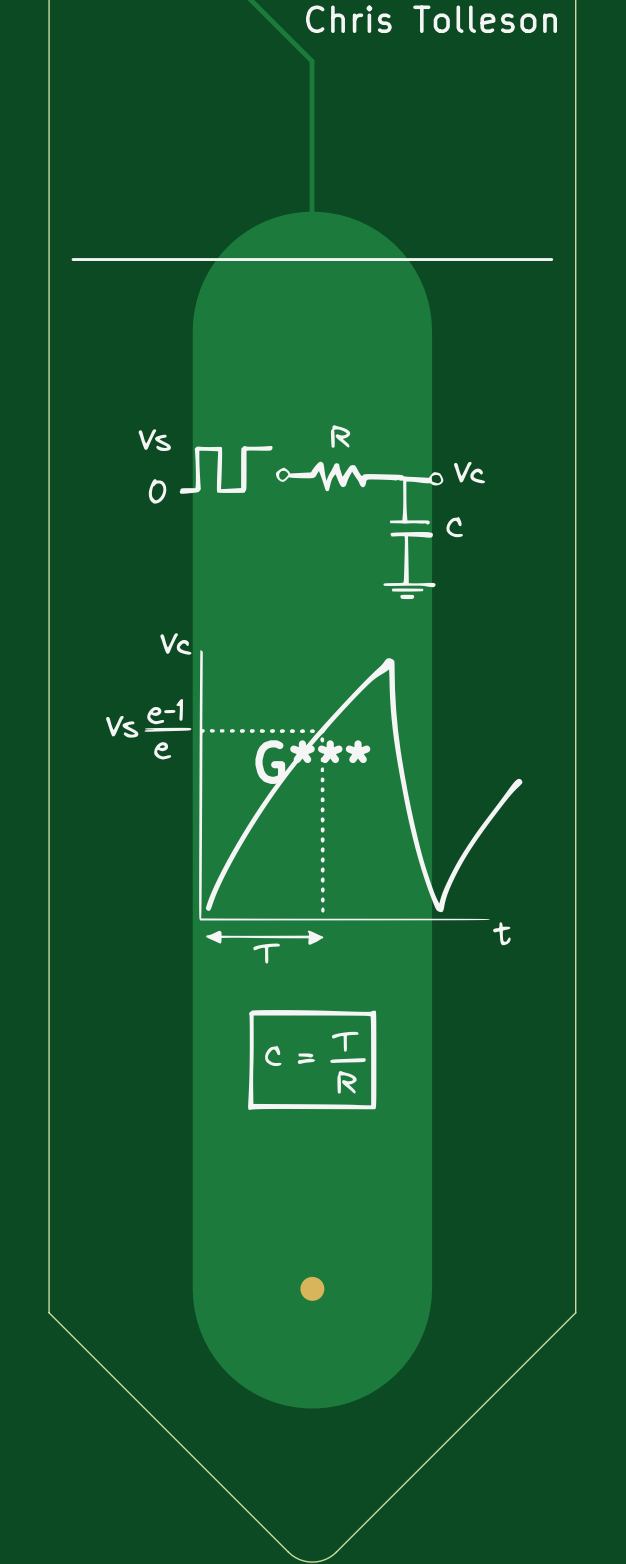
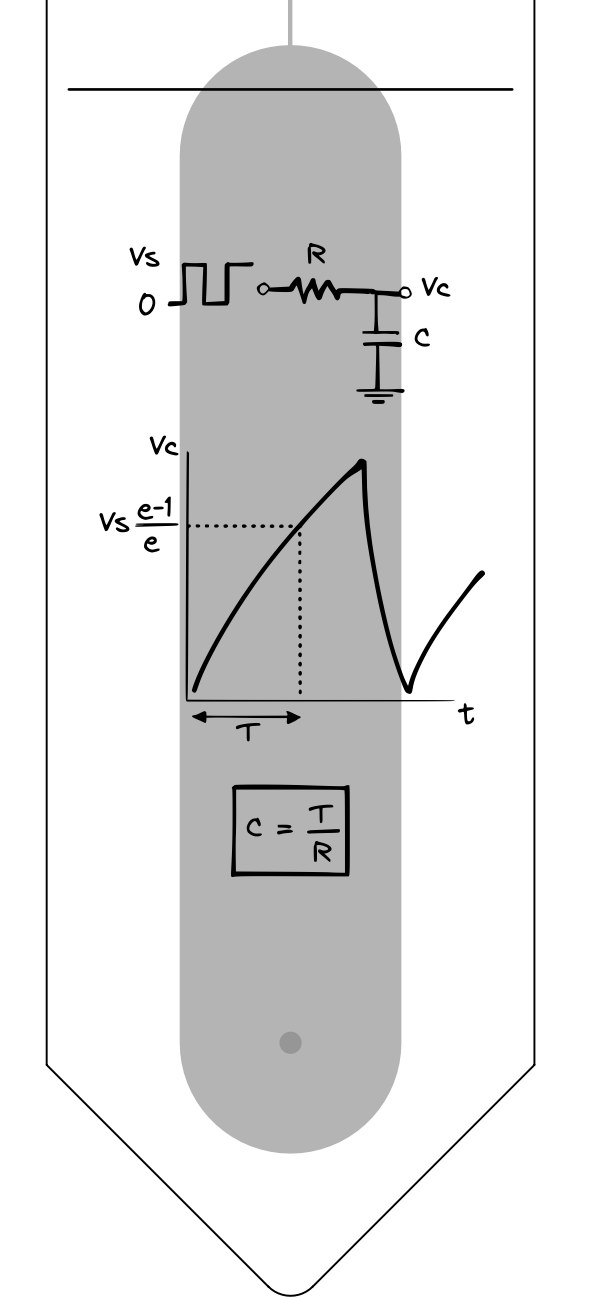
drawing: none -> [99, 242, 486, 878]
G***: (314, 767) -> none

